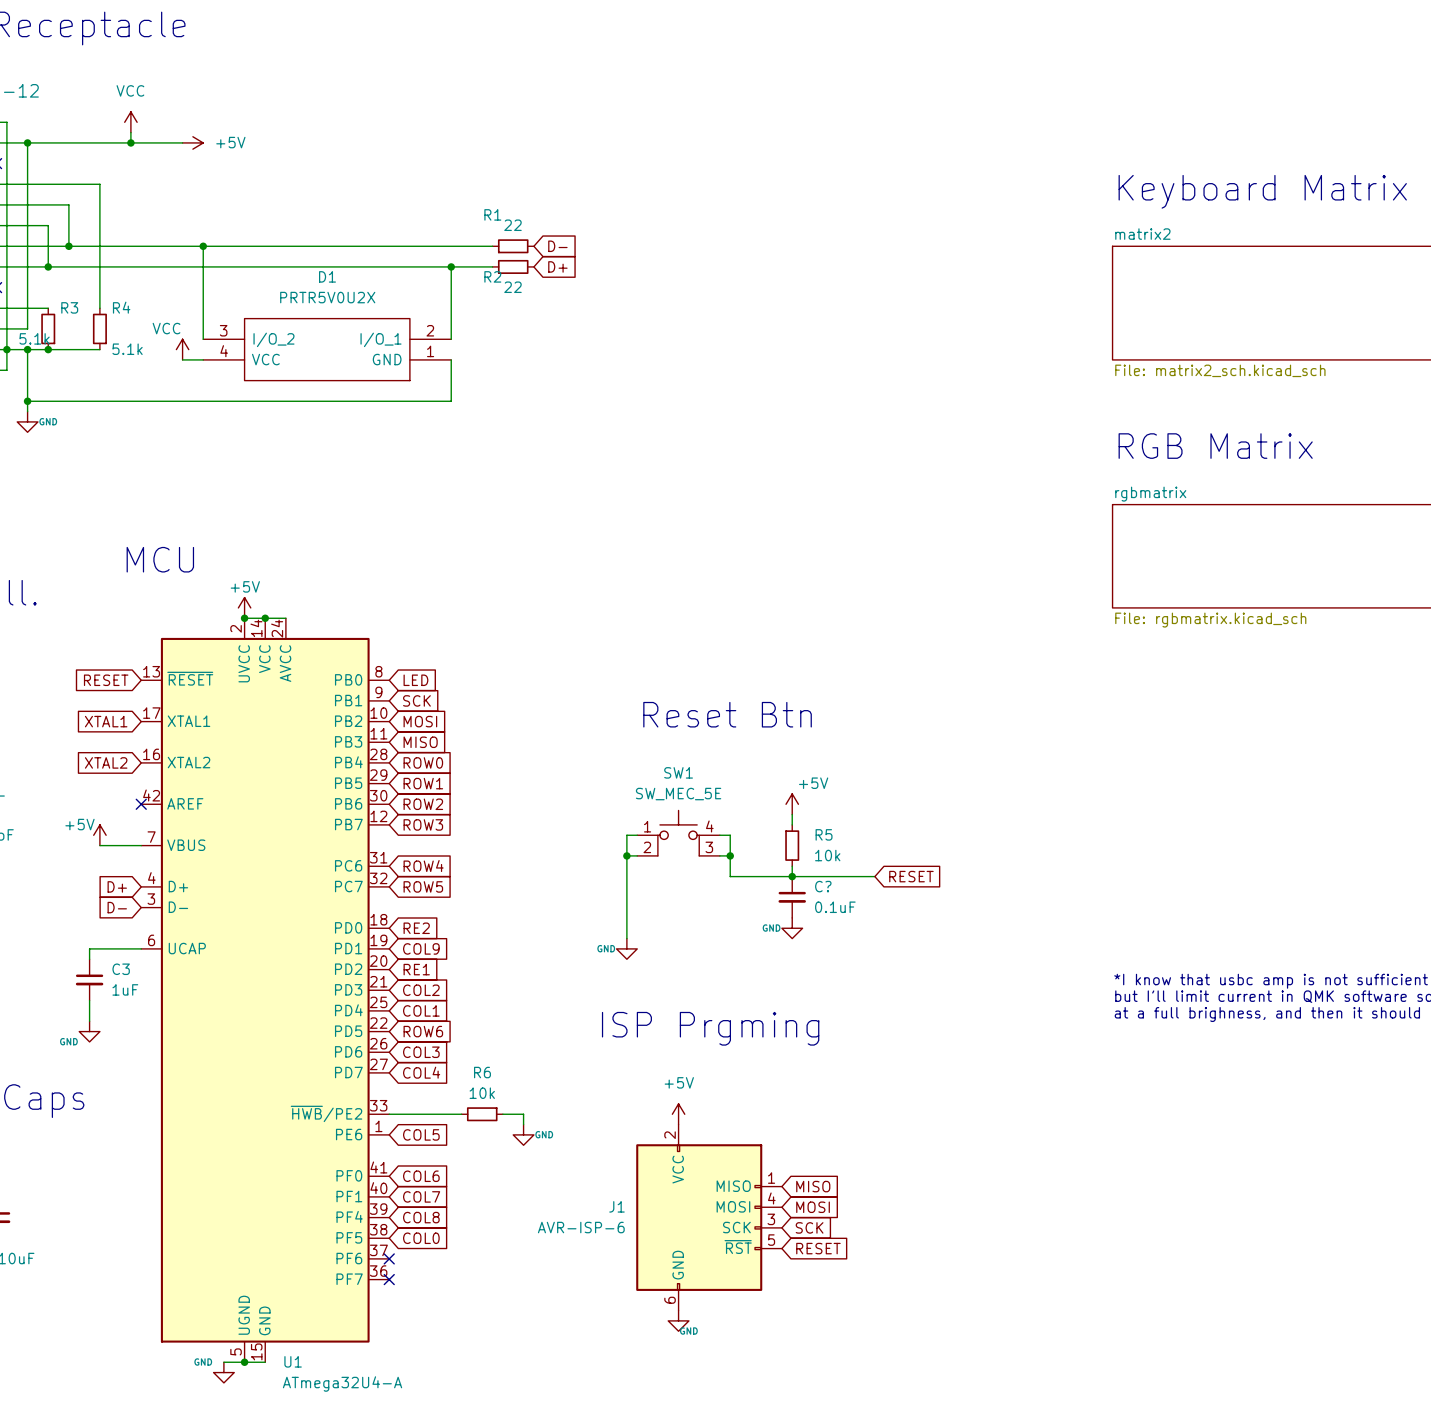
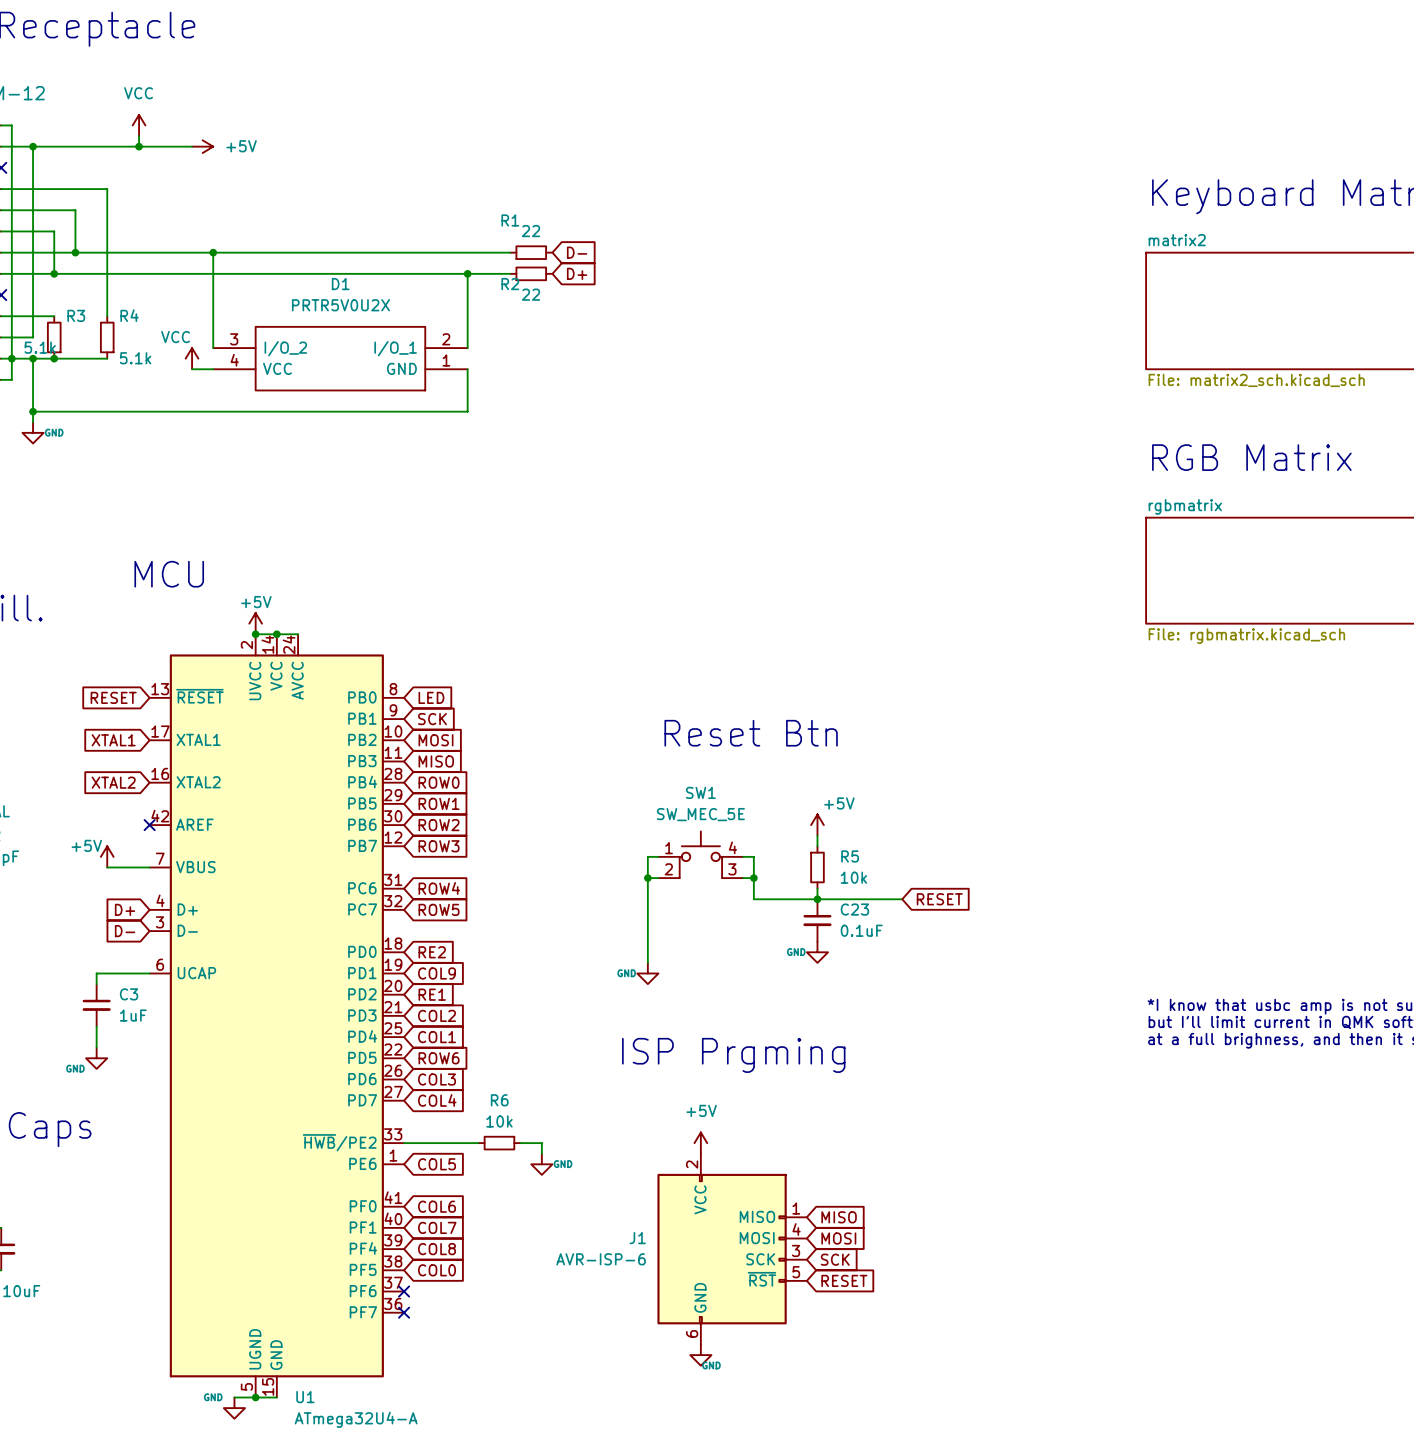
C? name: C? (823, 886) -> C23 (854, 909)

